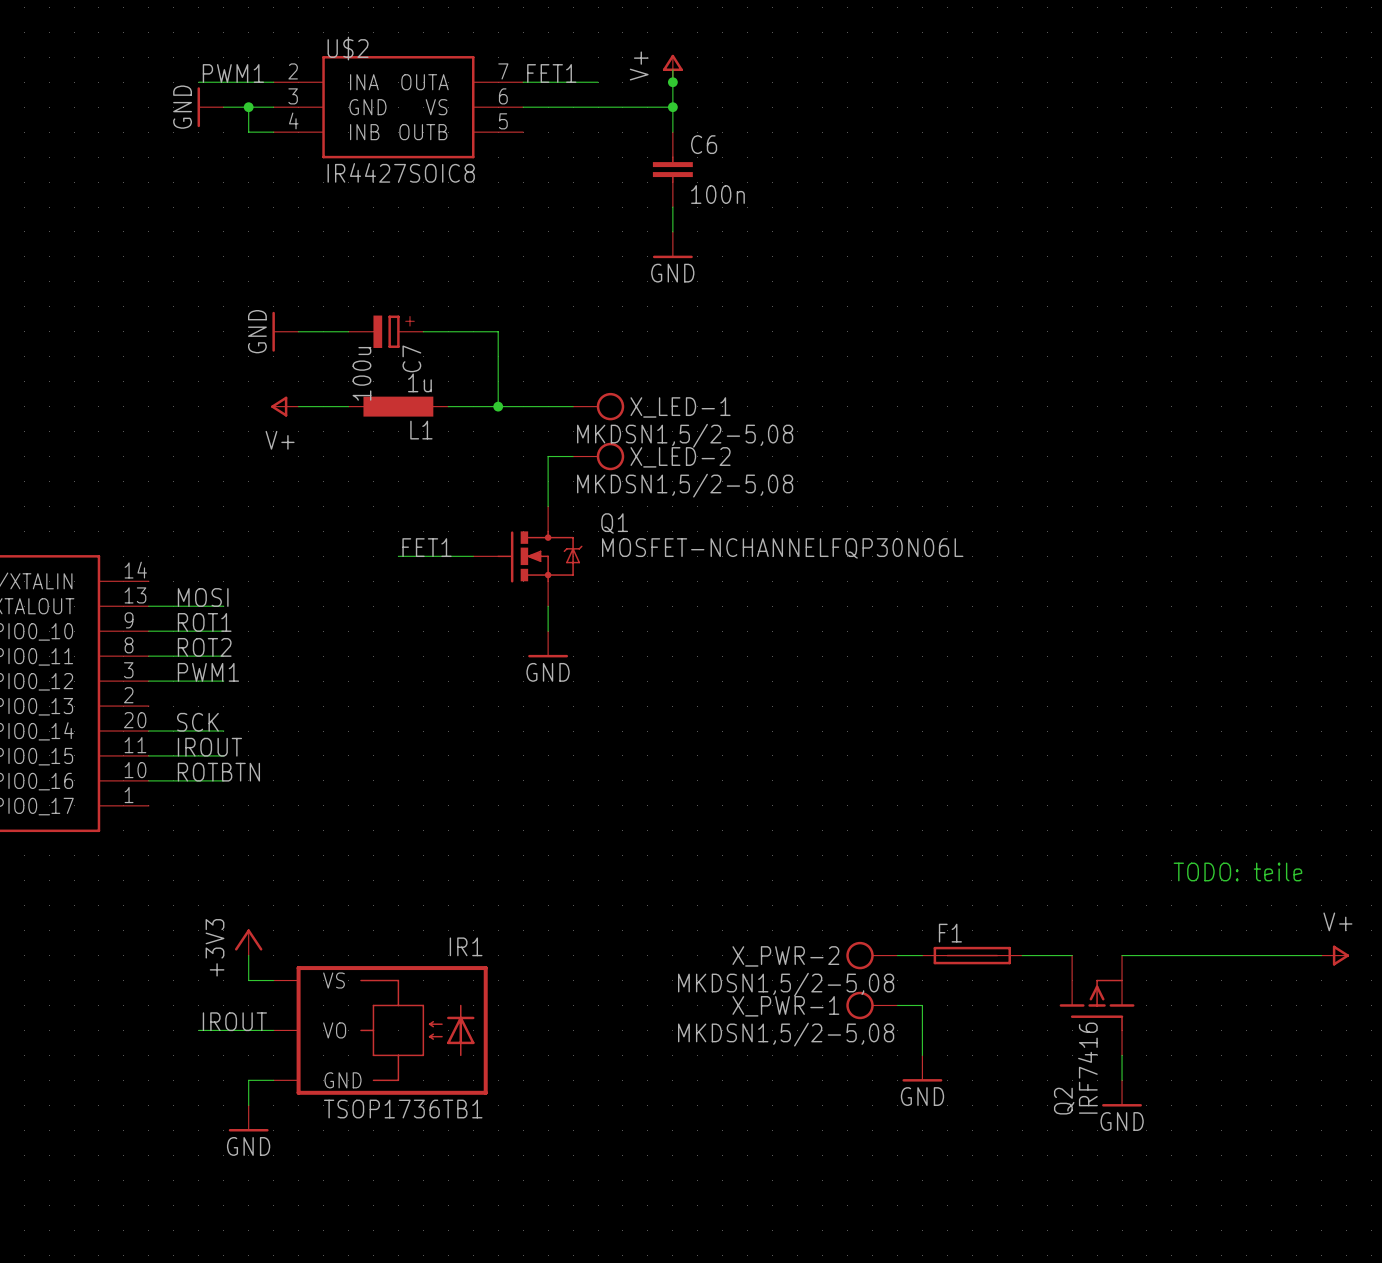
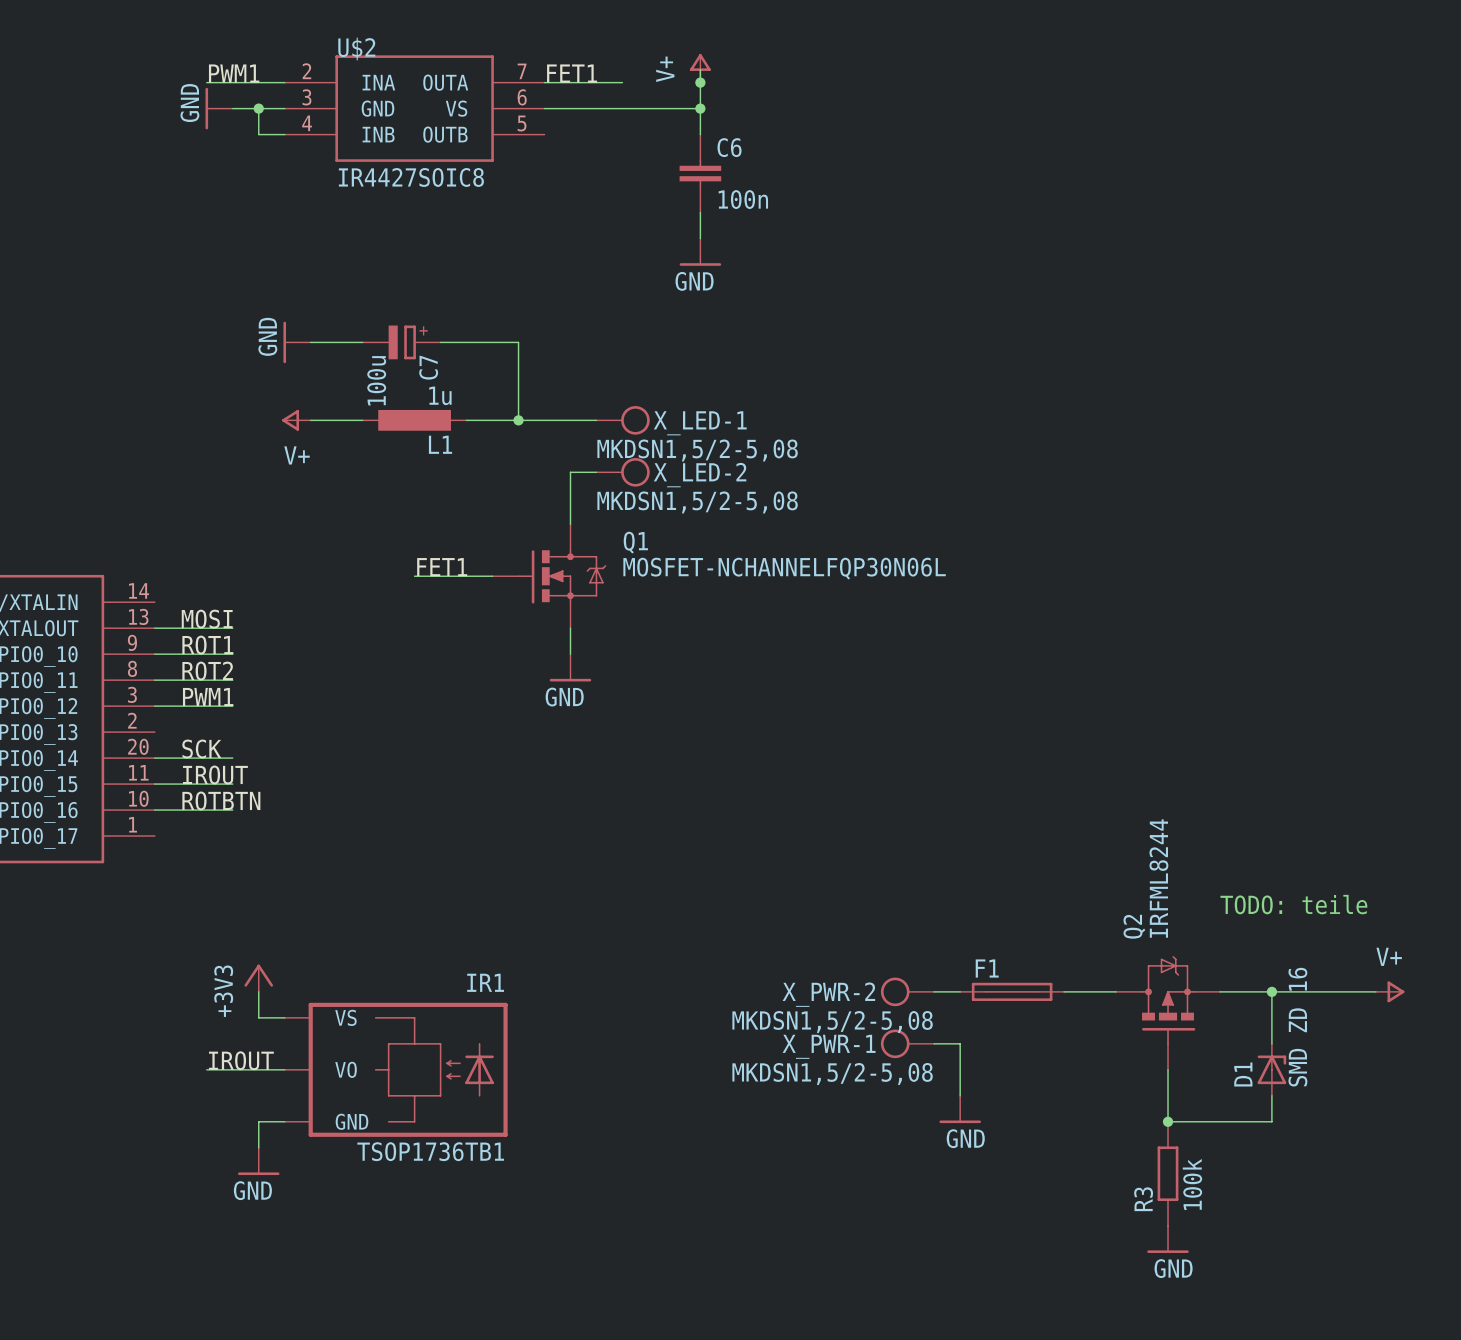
Q2 symbol: [1059, 955, 1135, 1056] -> [1116, 956, 1220, 1070]
wire: none -> (1271, 991) (1271, 1043)
junction: none -> (1271, 991)
D1: none -> SMD ZD 16 (1271, 1069)
wire: none -> (1271, 1095) (1271, 1121) (1168, 1121)
Q2 value: IRF7416 (1087, 1068) -> IRFML8244 (1158, 878)
junction: none -> (1168, 1121)
power symbol position: GND (1122, 1093) -> GND (1168, 1239)
Q2 name position: Q2 (1064, 1101) -> Q2 (1134, 926)
R3: none -> 100k (1168, 1173)

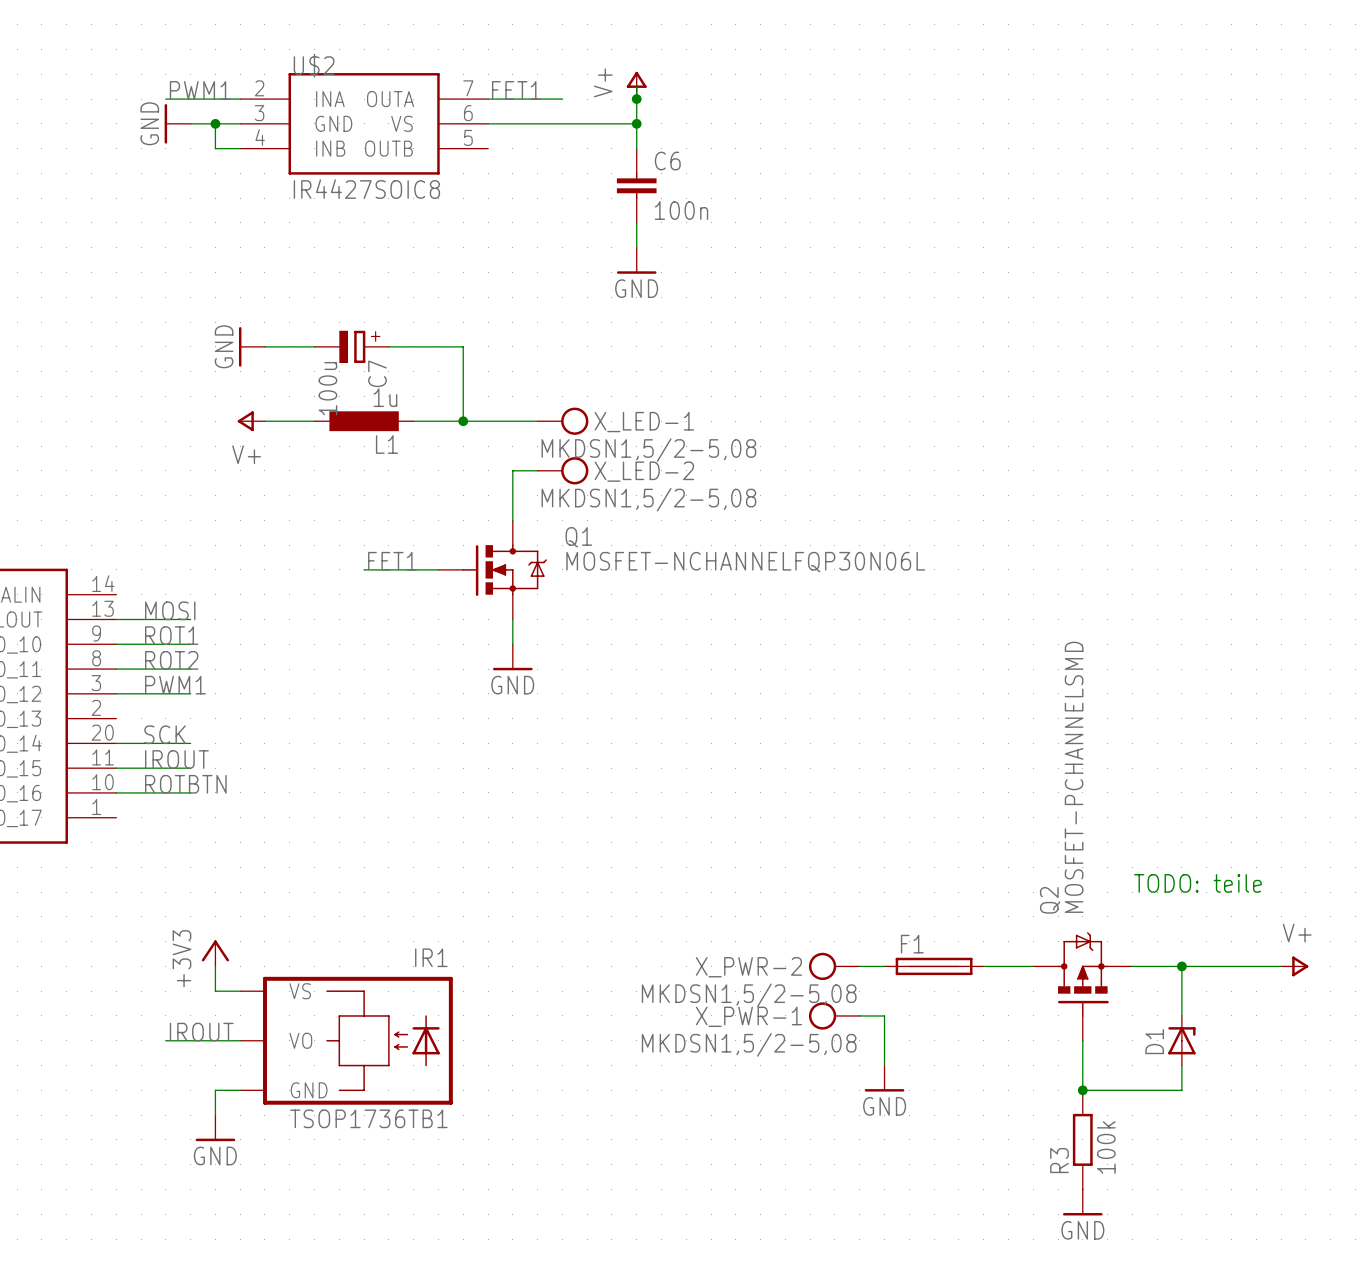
Q2 value: IRFML8244 (1158, 878) -> MOSFET-PCHANNELSMD (1074, 777)
D1 value: SMD ZD 16 (1297, 1027) -> none

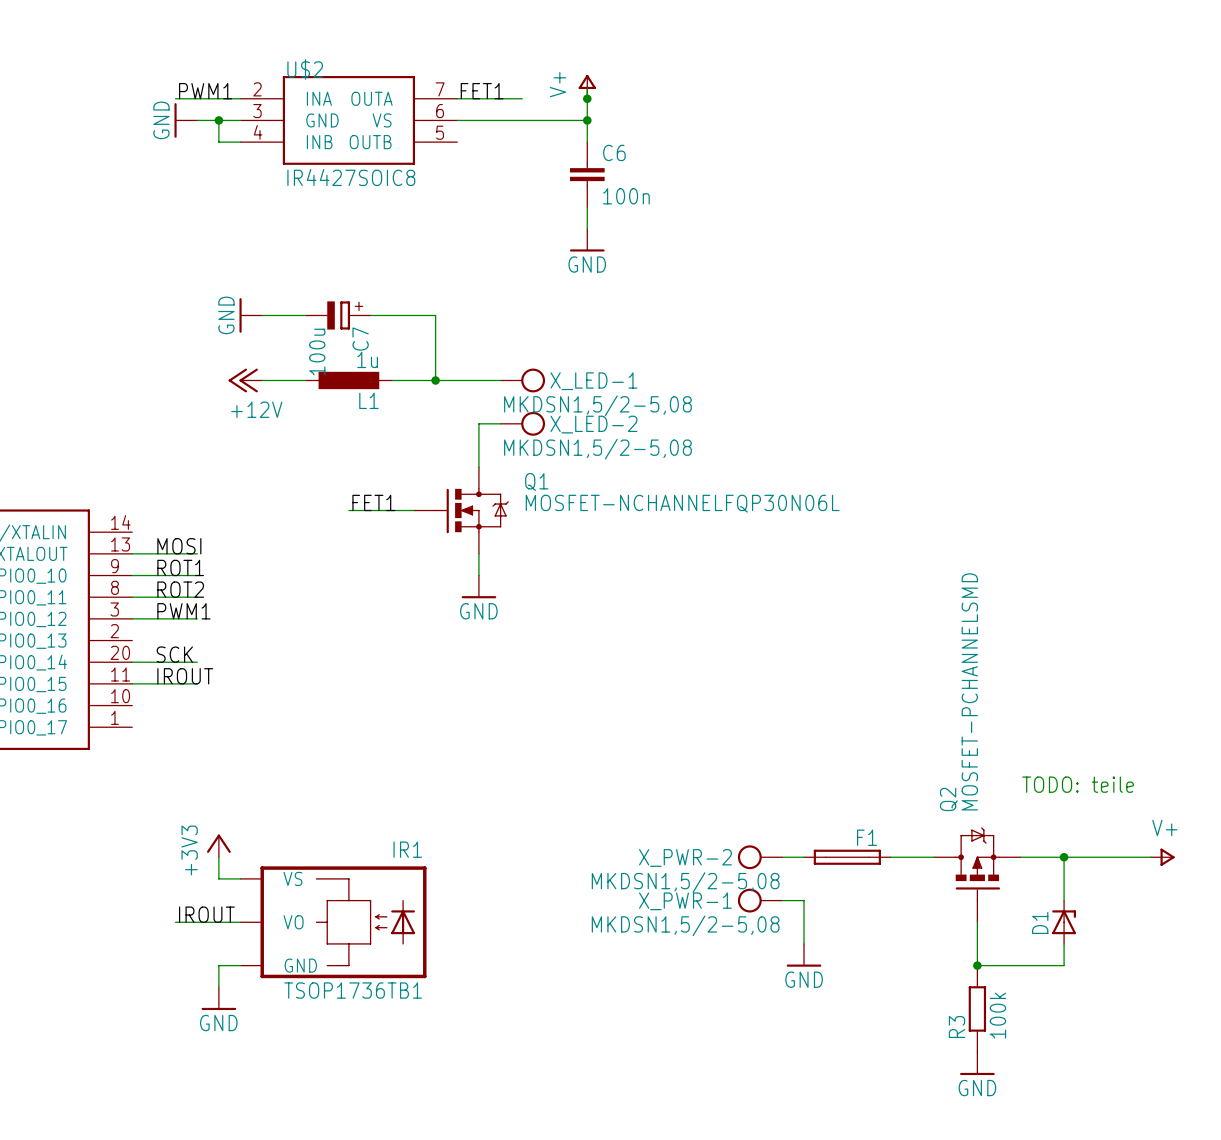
power symbol: V+ (251, 421) -> +12V (245, 380)
label: ROTBTN (185, 784) -> none
wire: (116, 792) (190, 792) -> none
F1 name position: F1 (912, 944) -> F1 (867, 837)

